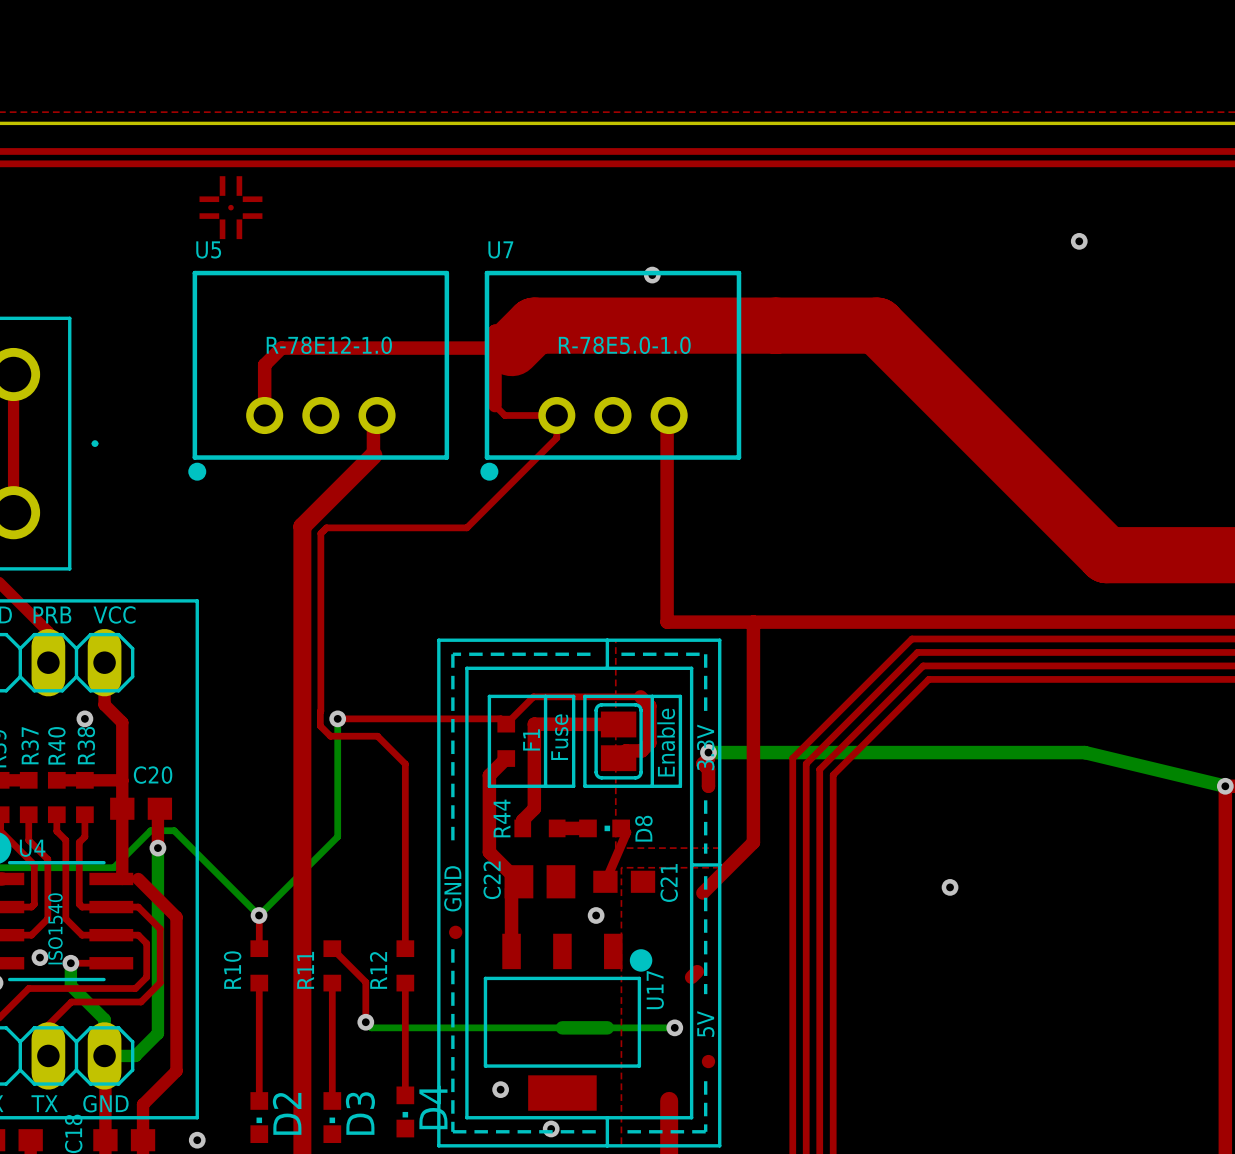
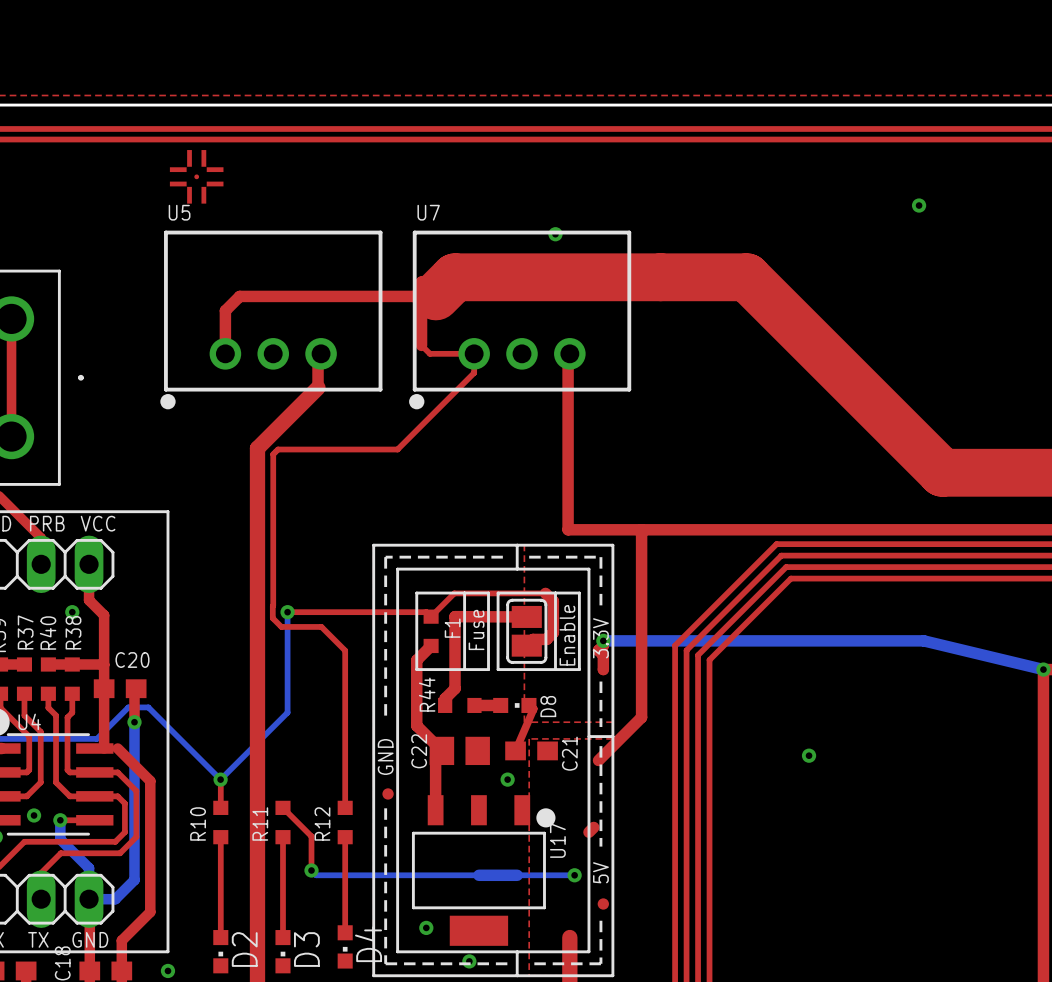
U5 value: R-78E12-1.0 (329, 345) -> none
U7 value: R-78E5.0-1.0 (624, 345) -> none
U4 value: ISO1540 (55, 928) -> none

